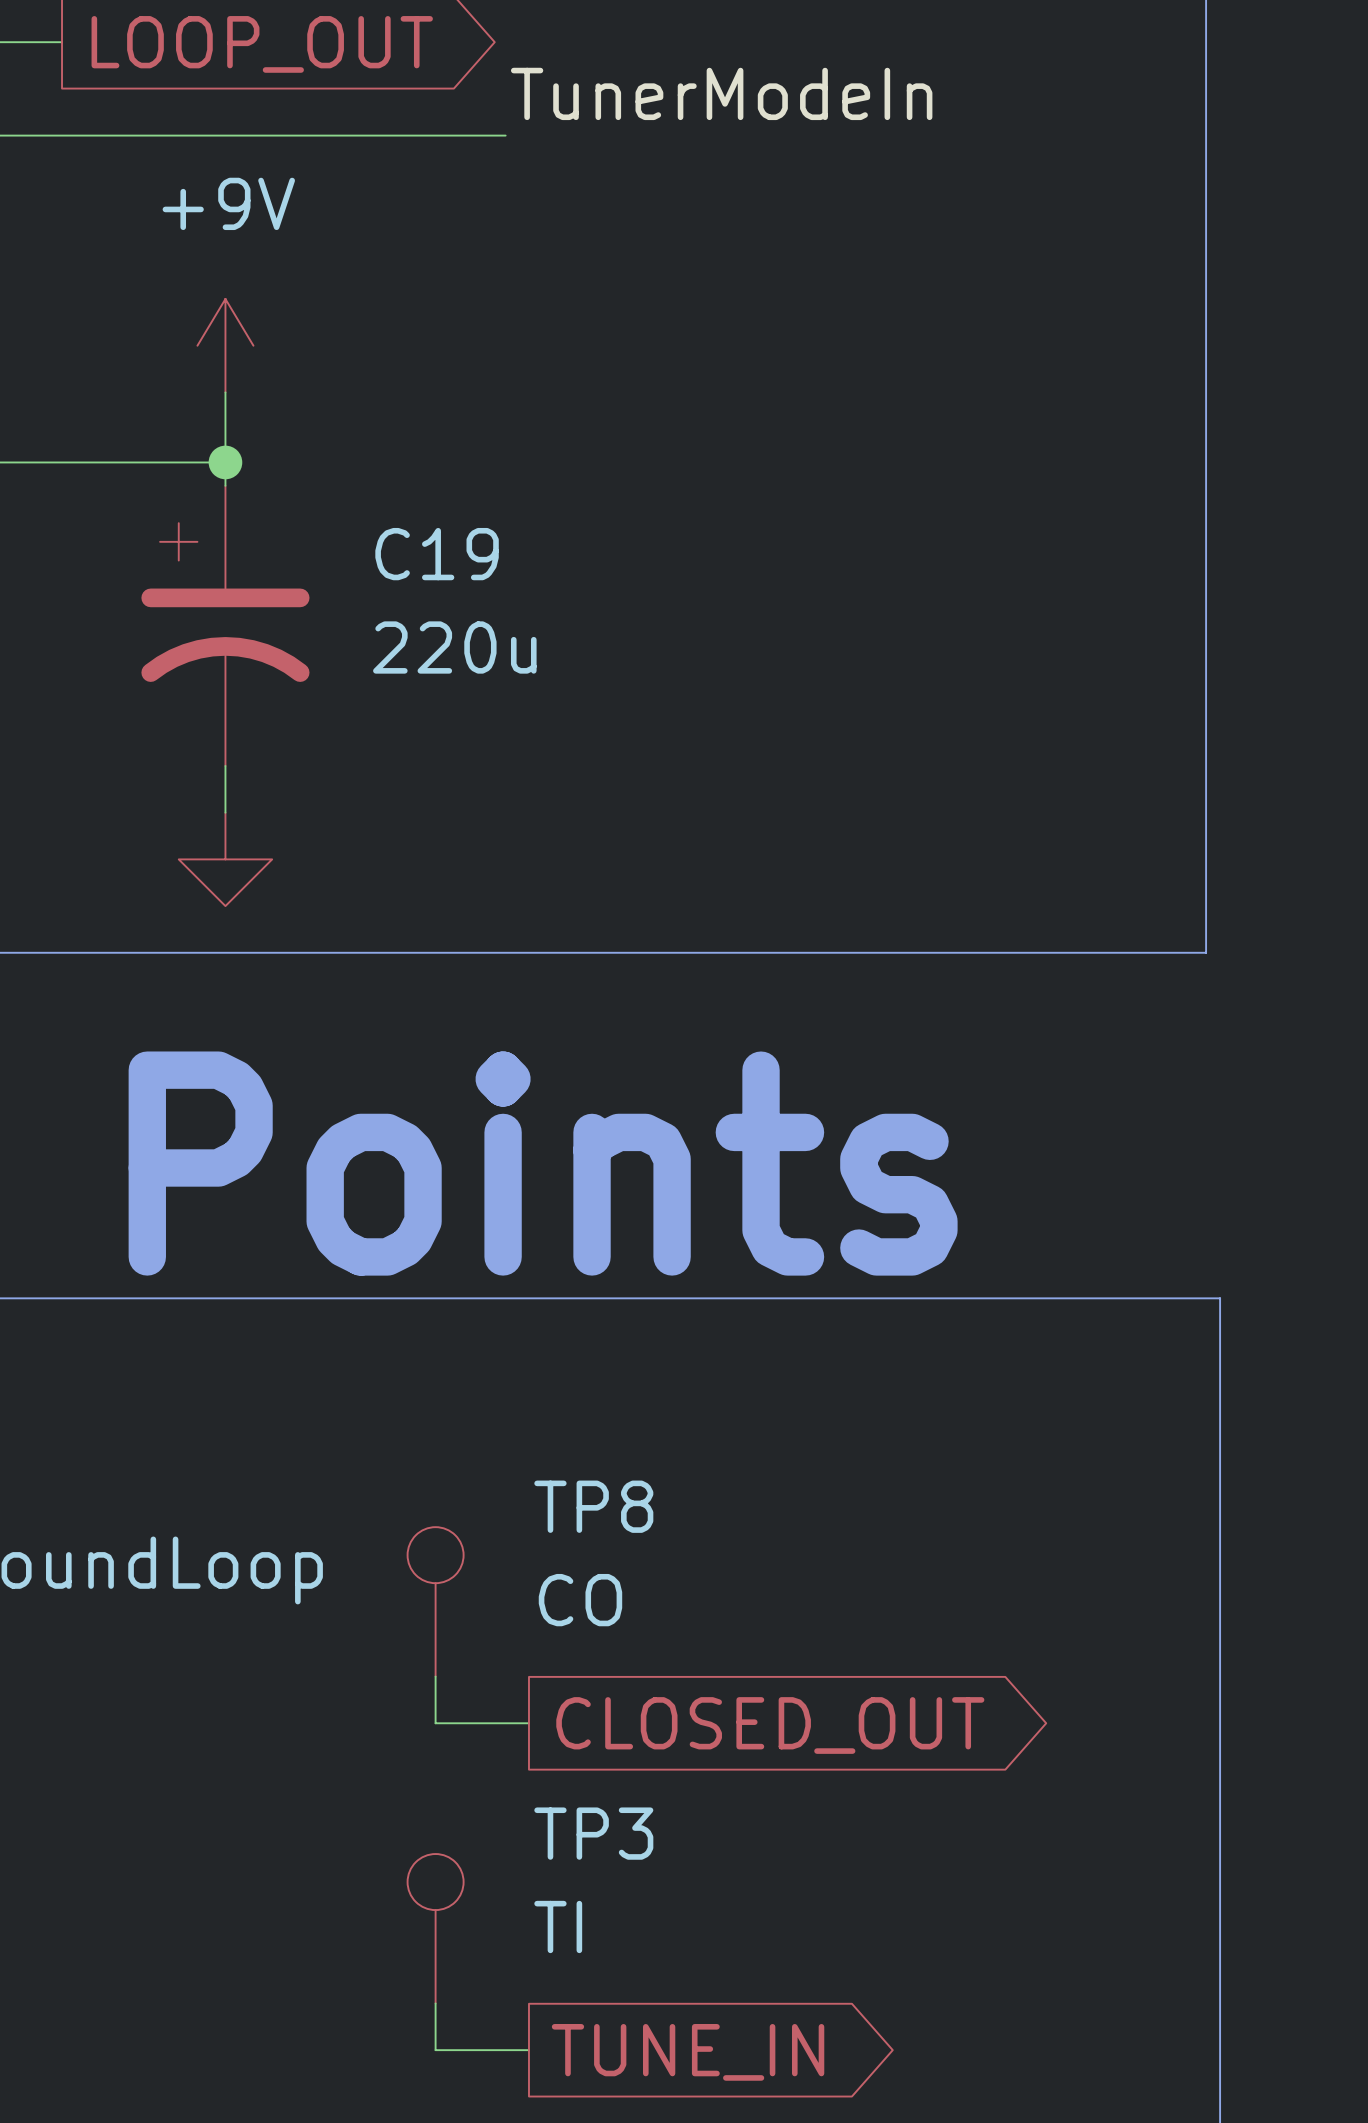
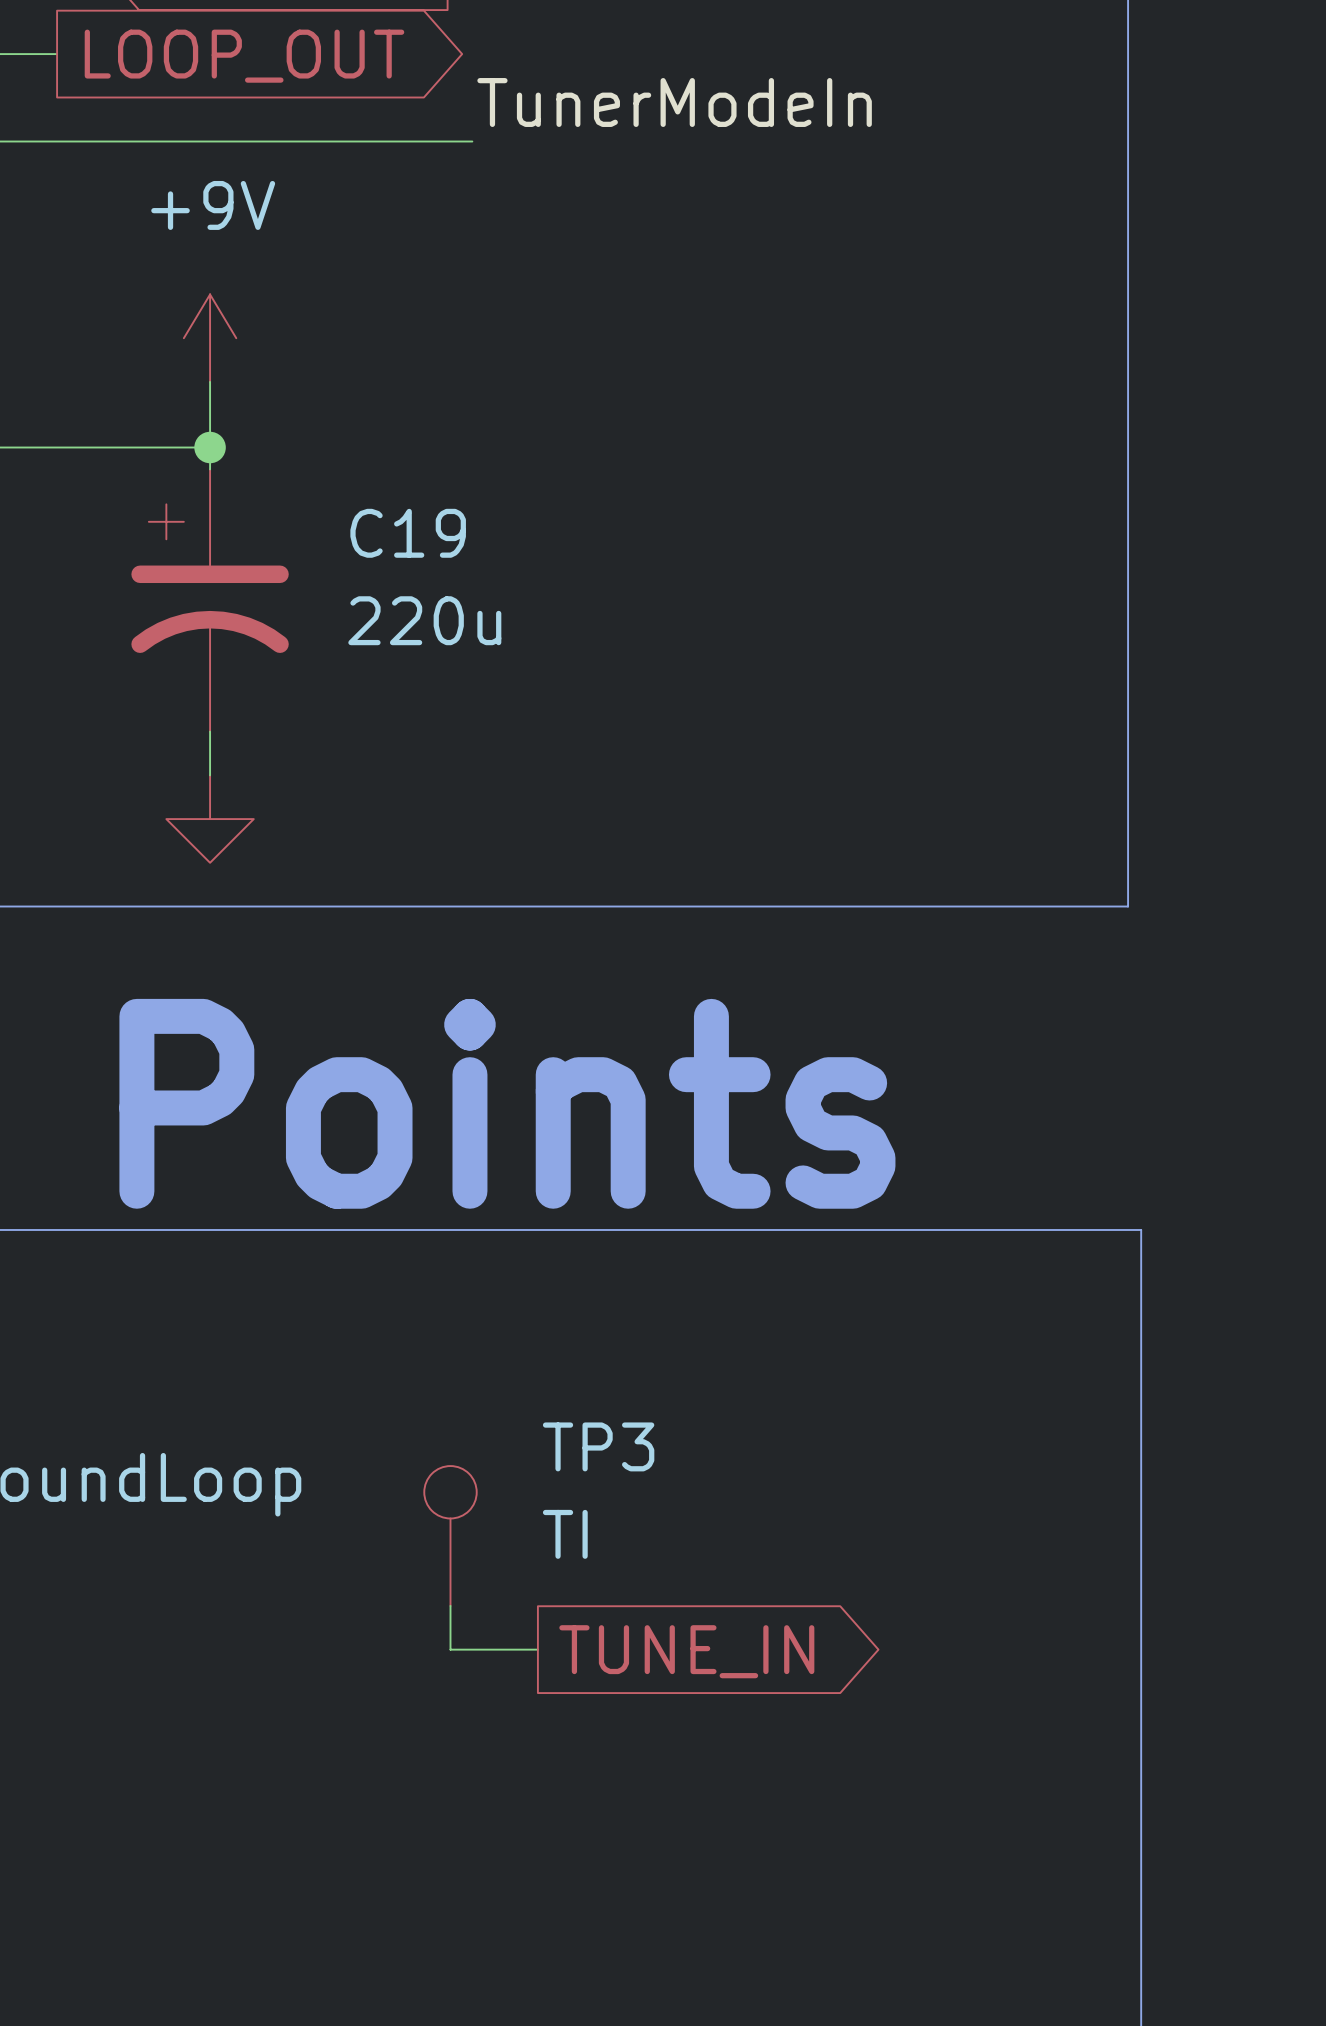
TP8: CO (435, 1601) -> none
wire: (435, 1676) (435, 1723) (528, 1723) -> (450, 1605) (450, 1649) (537, 1649)
global label: CLOSED_OUT (770, 1725) -> none
TP3 position: (435, 1928) -> (450, 1535)
wire: (435, 2003) (435, 2050) (528, 2050) -> none
global label position: TUNE_IN (688, 2052) -> TUNE_IN (686, 1651)

